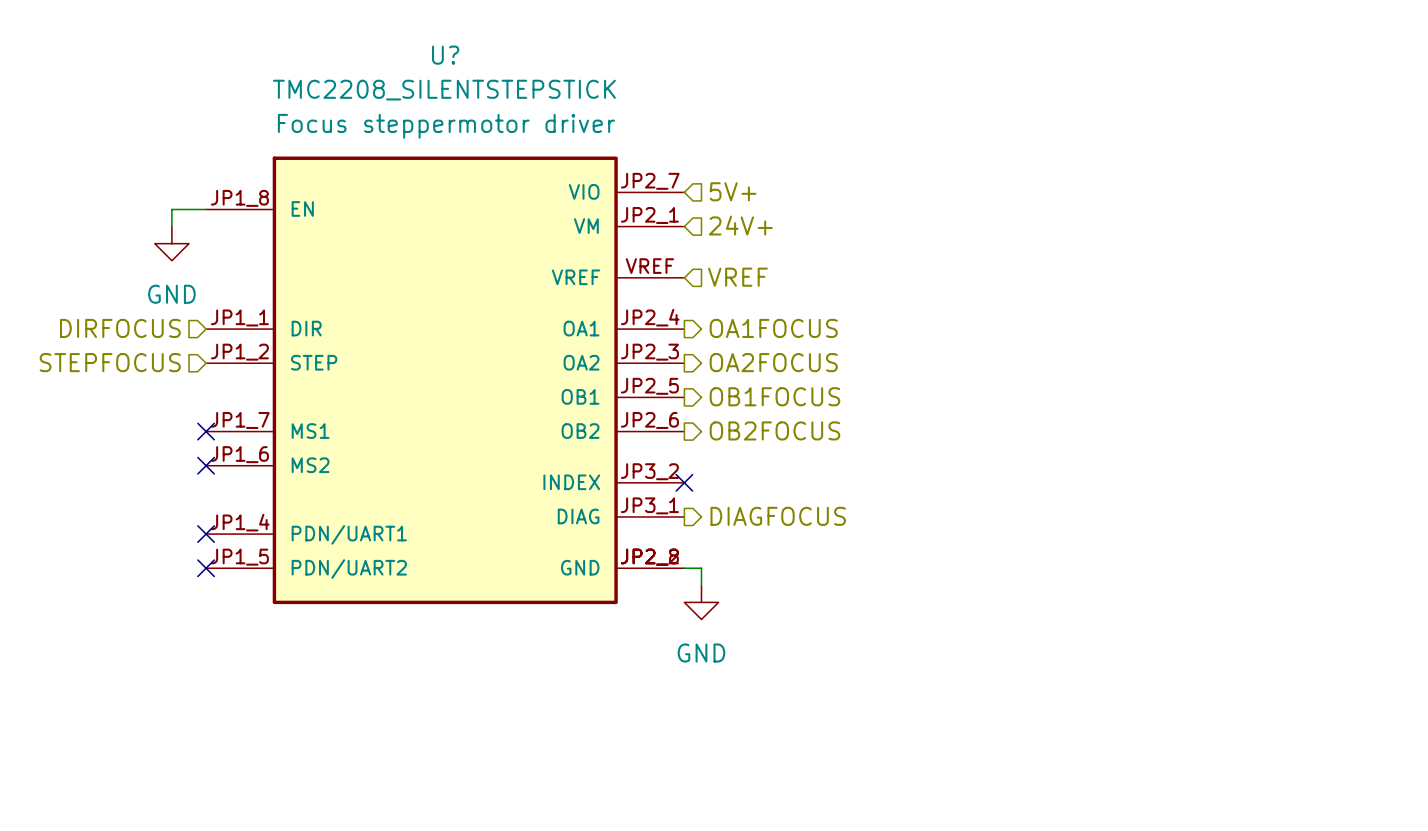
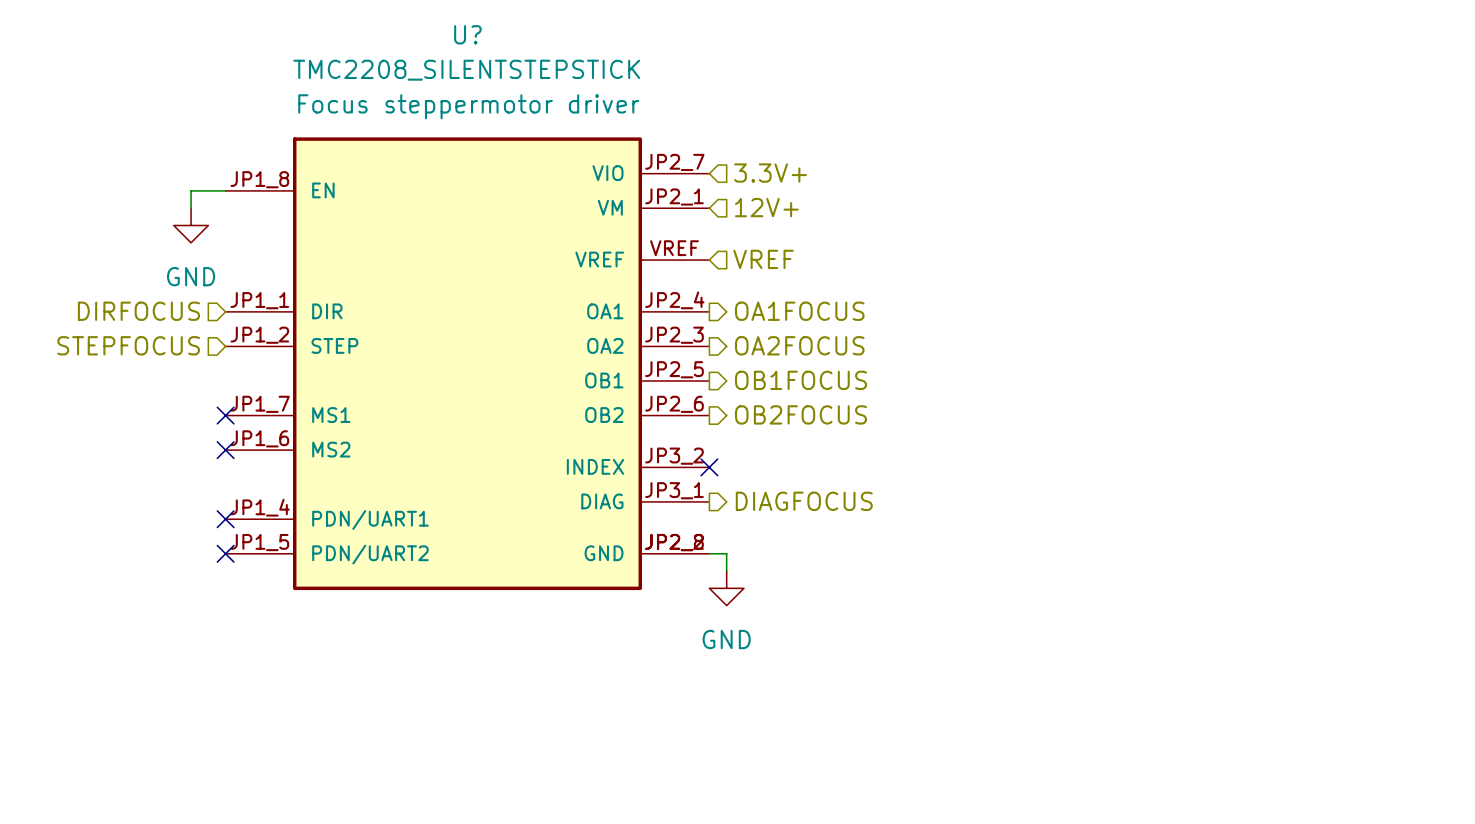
hierarchical label: 5V+ (733, 191) -> 3.3V+ (770, 173)
hierarchical label: 24V+ (740, 225) -> 12V+ (766, 207)

